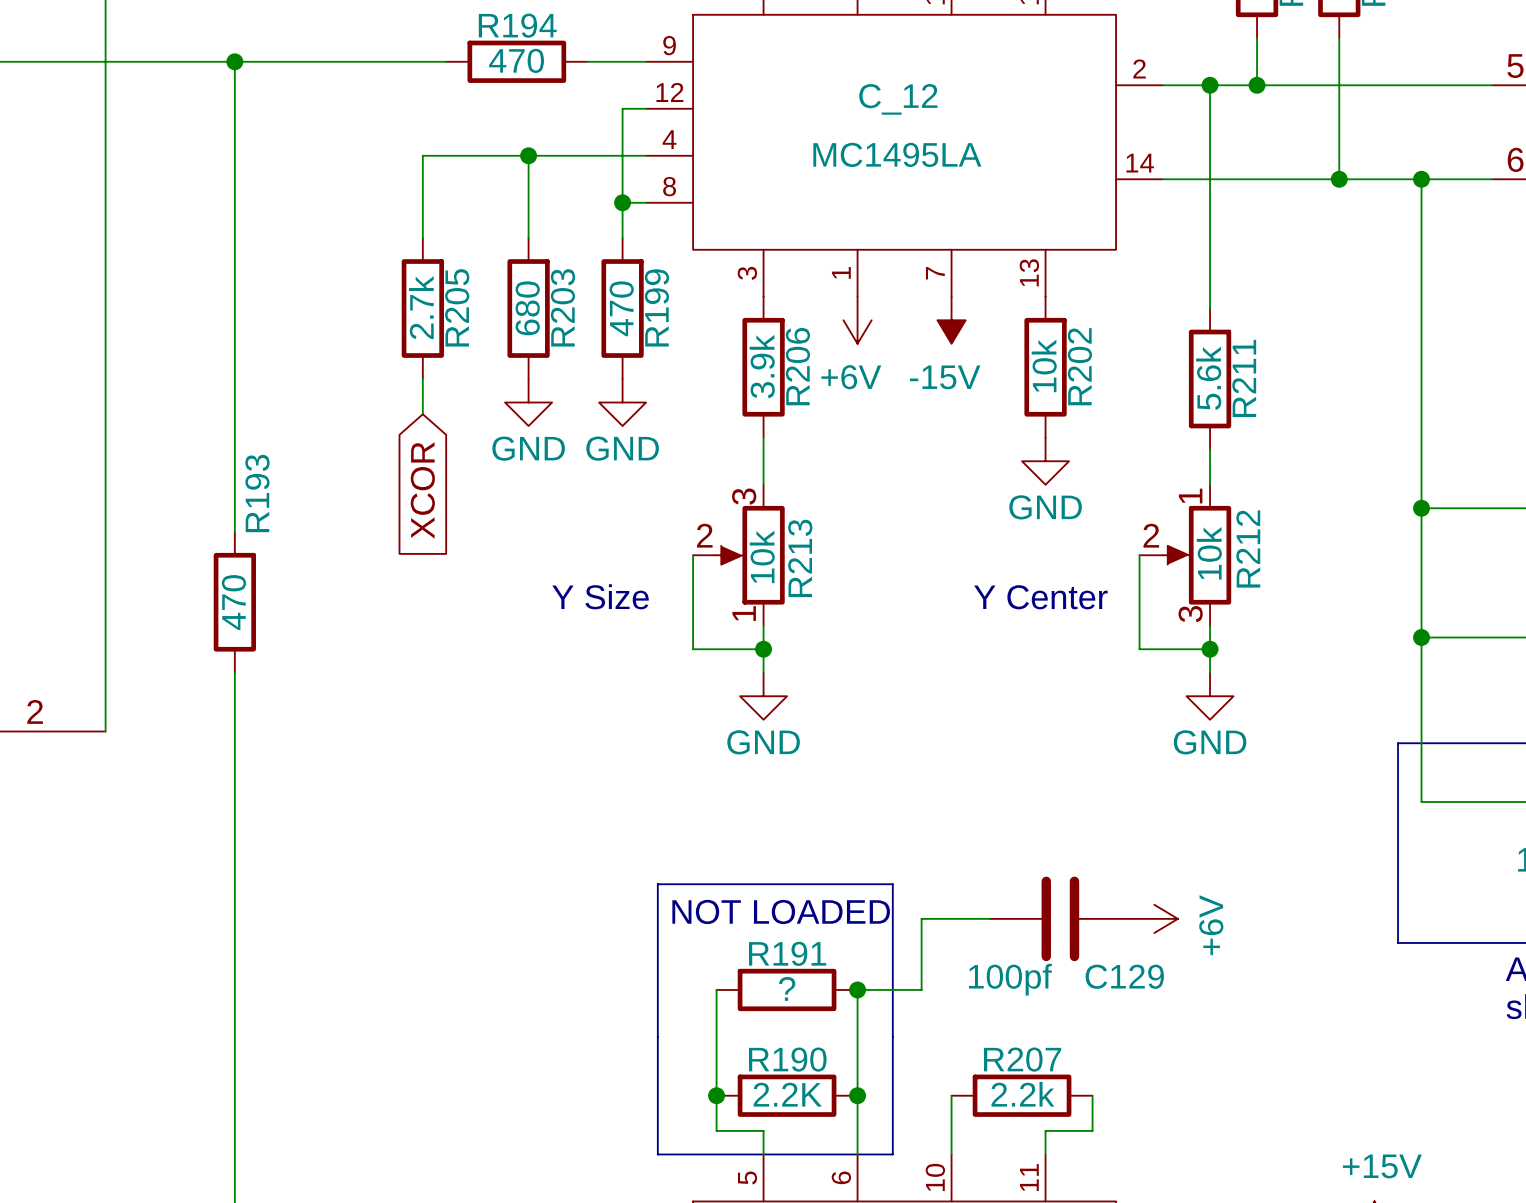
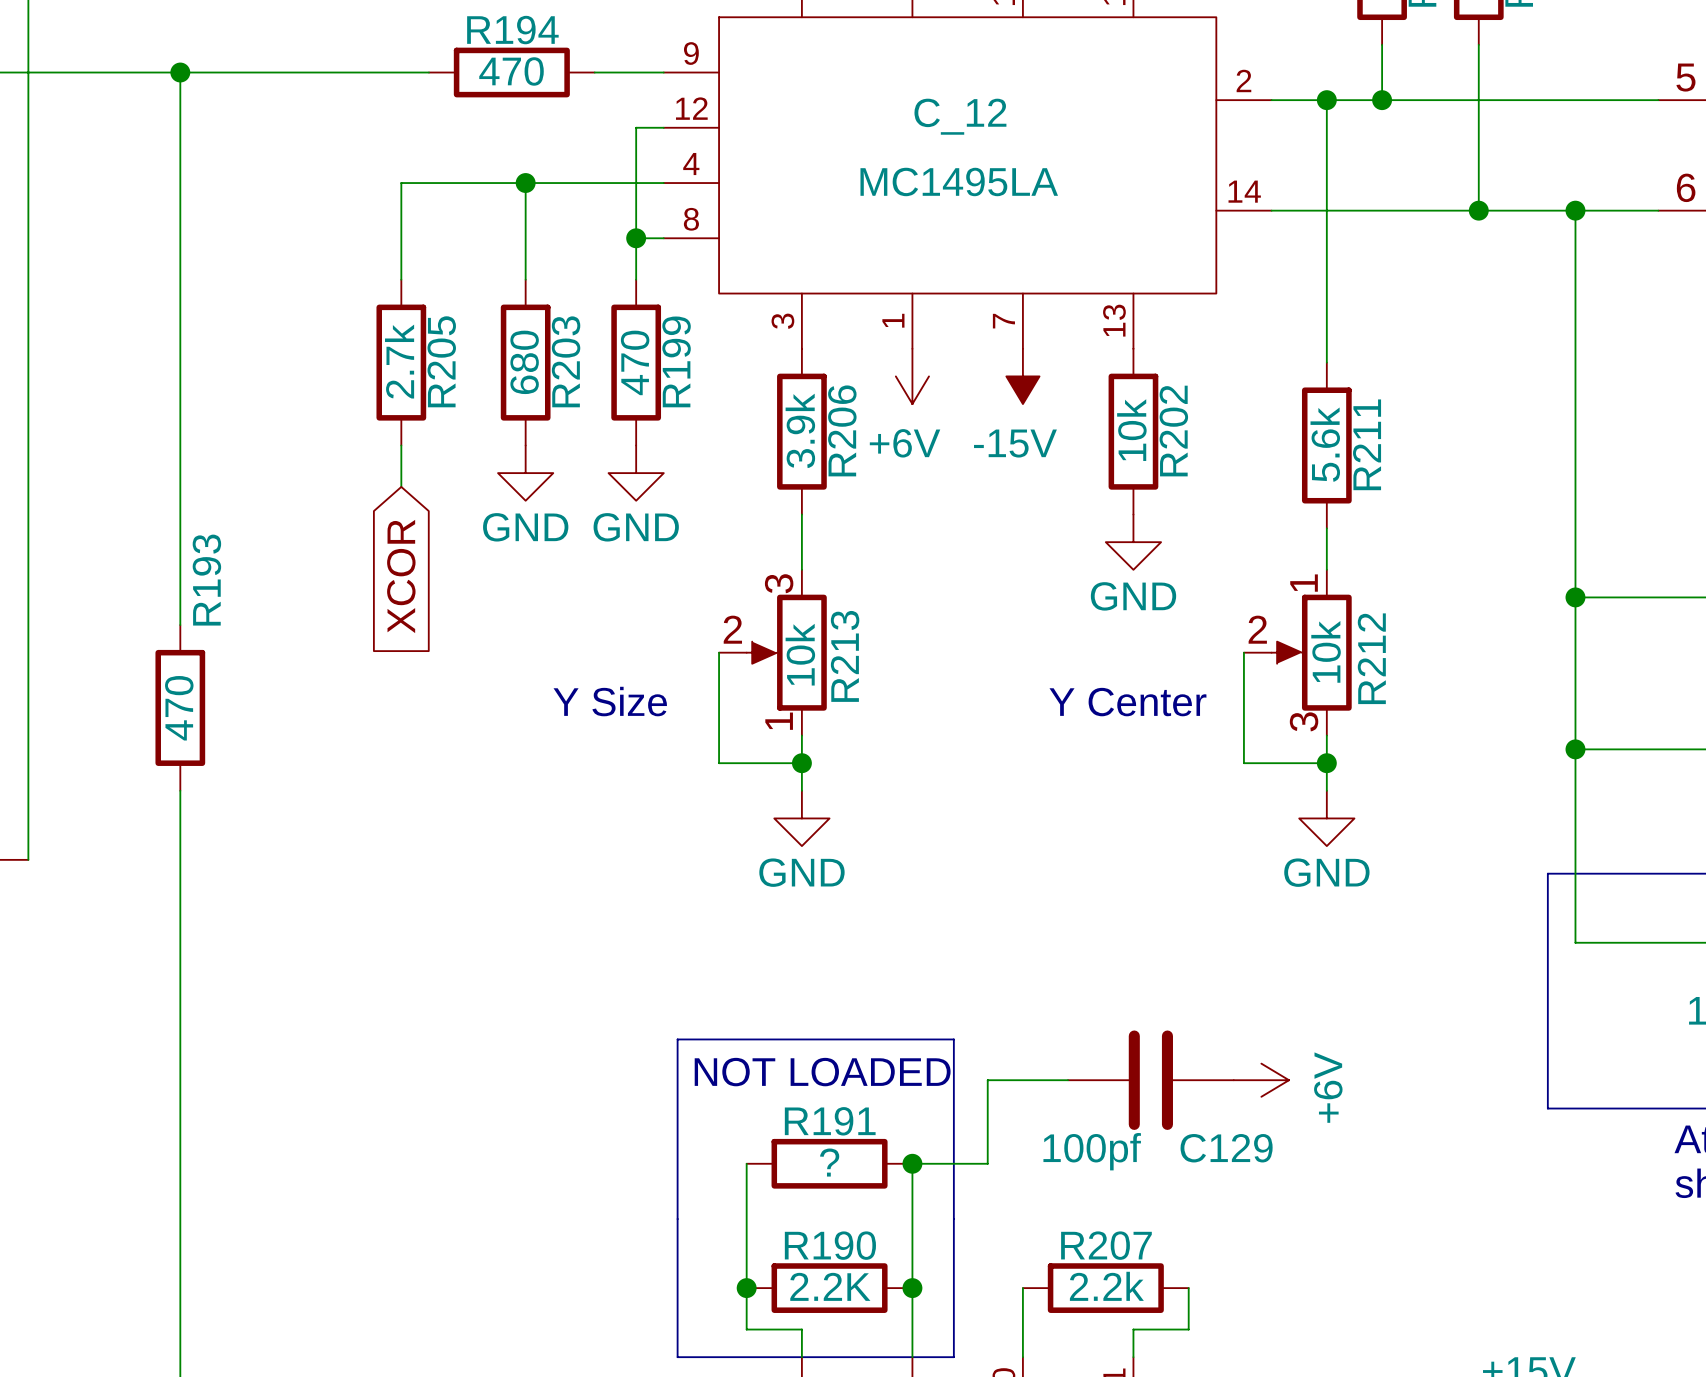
R212 name position: R212 (1248, 549) -> R212 (1371, 658)
R212 value position: 10k (1209, 553) -> 10k (1326, 651)

